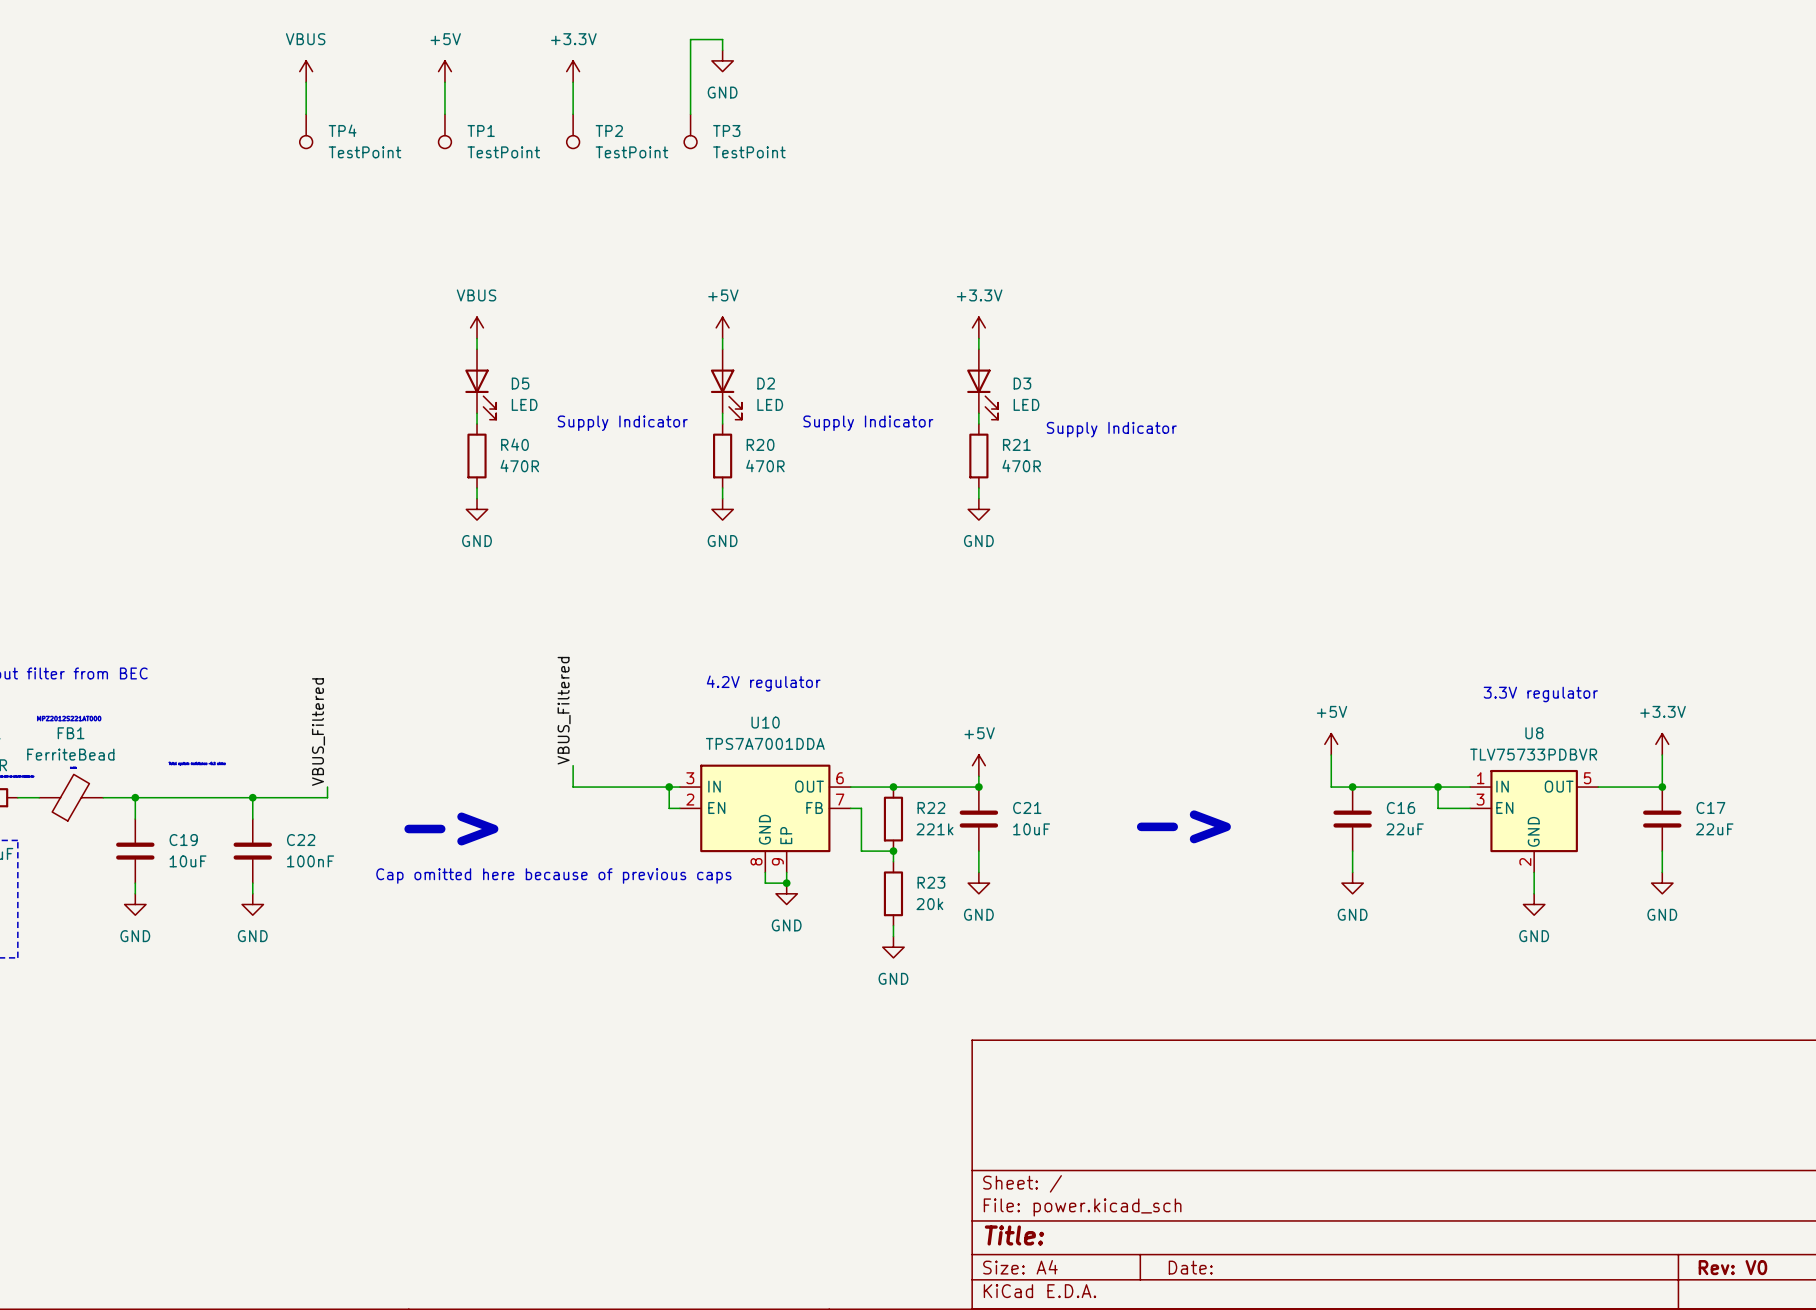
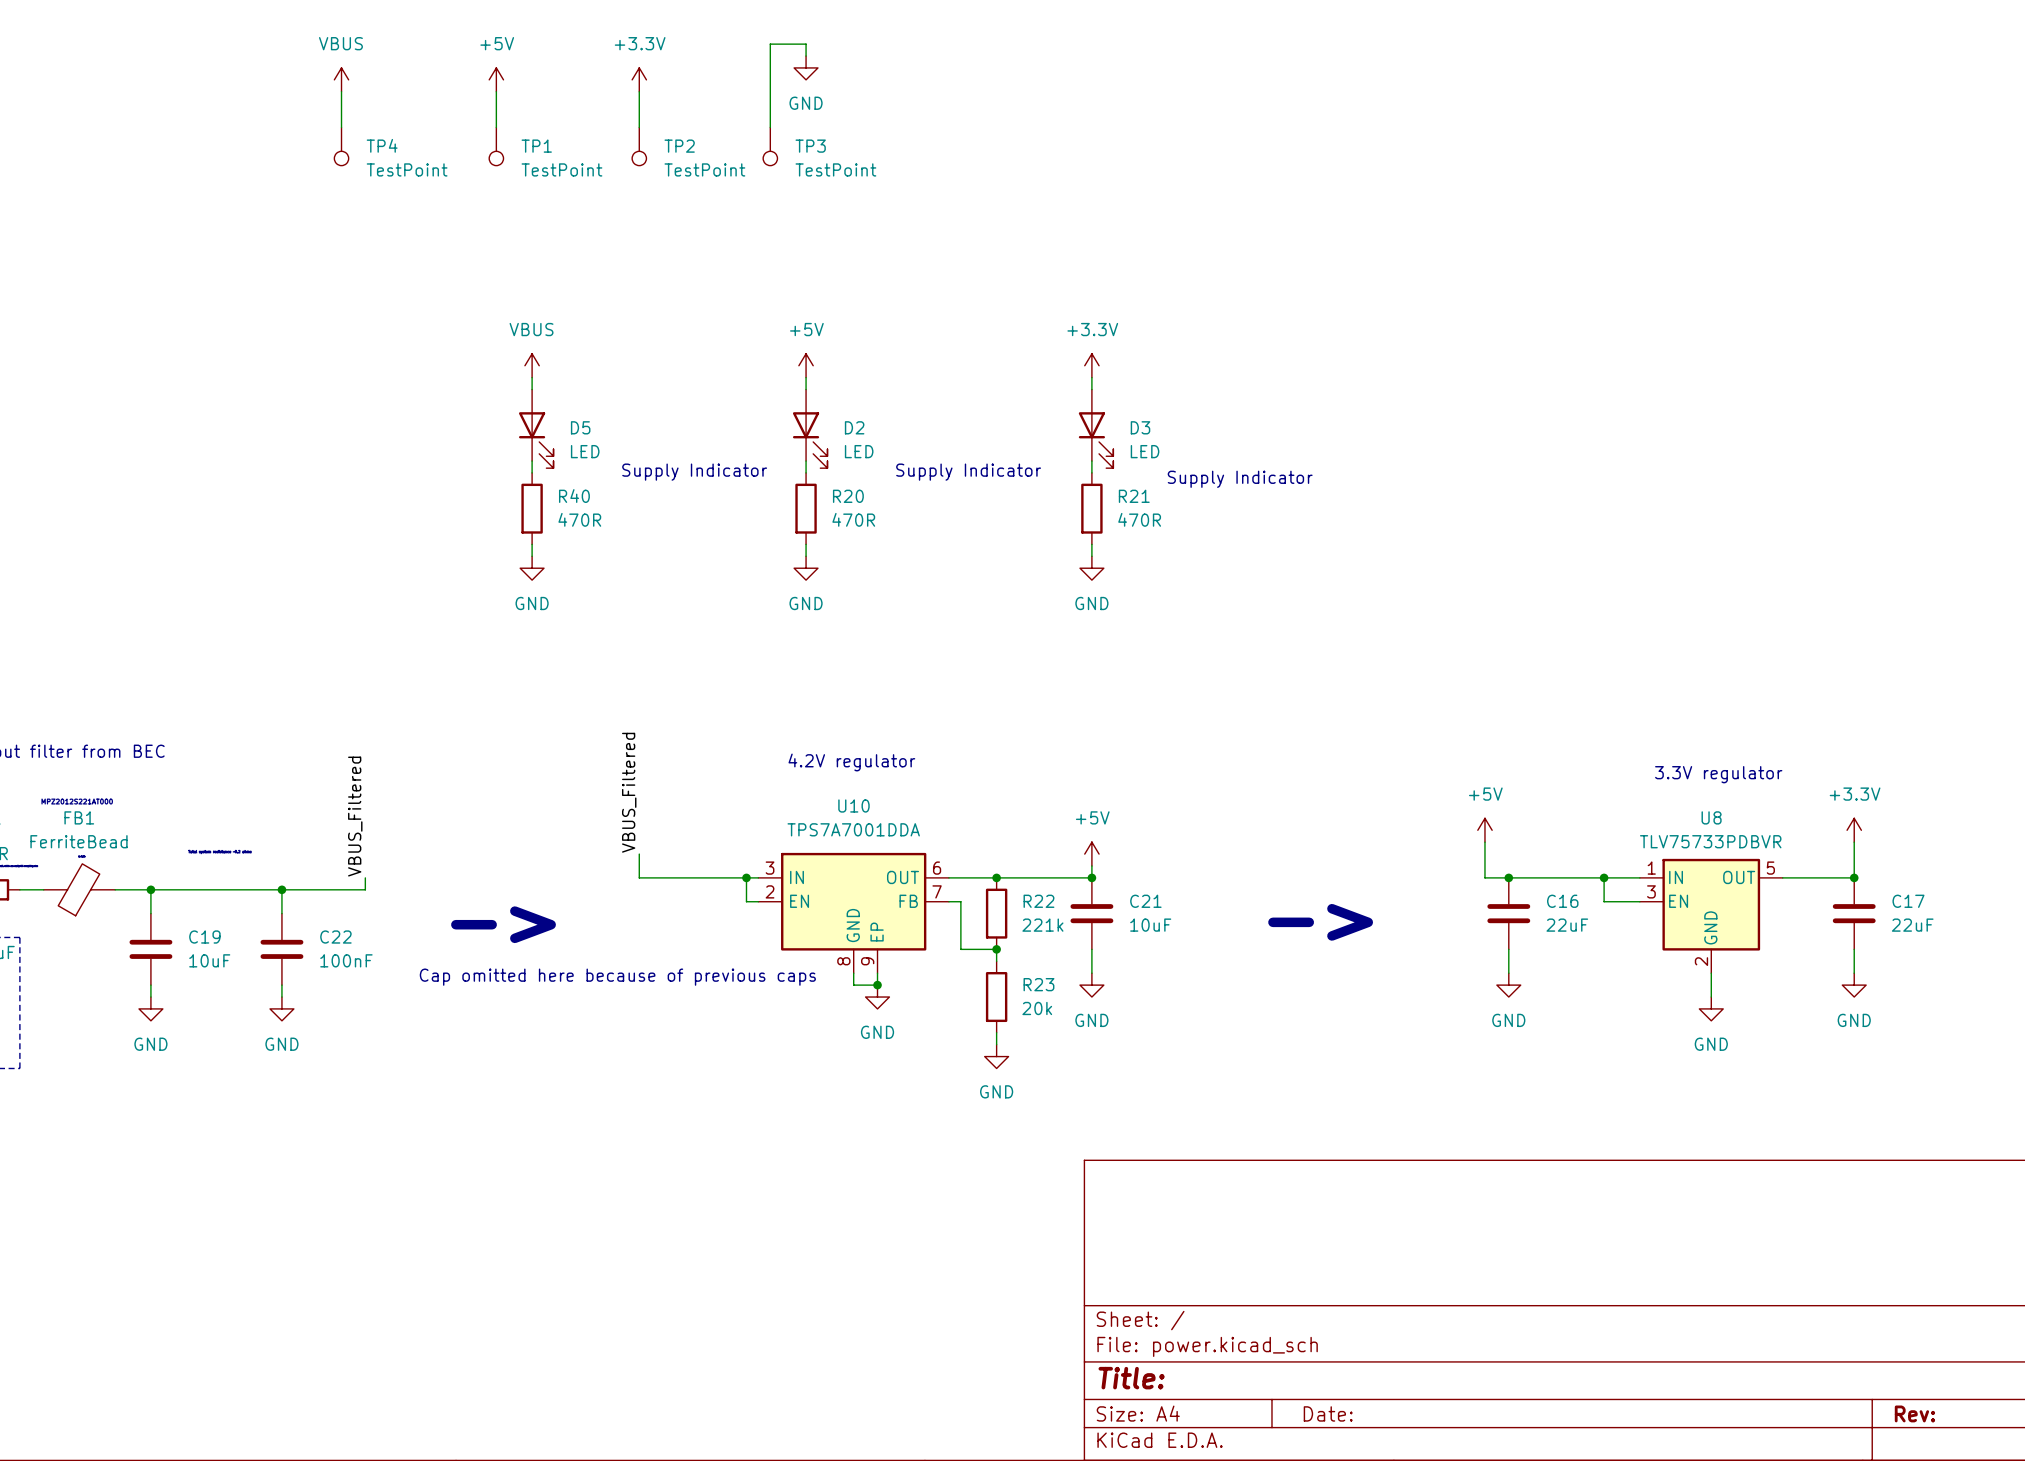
title block: Rev: V0 (1732, 1267) -> Rev: (1914, 1413)

